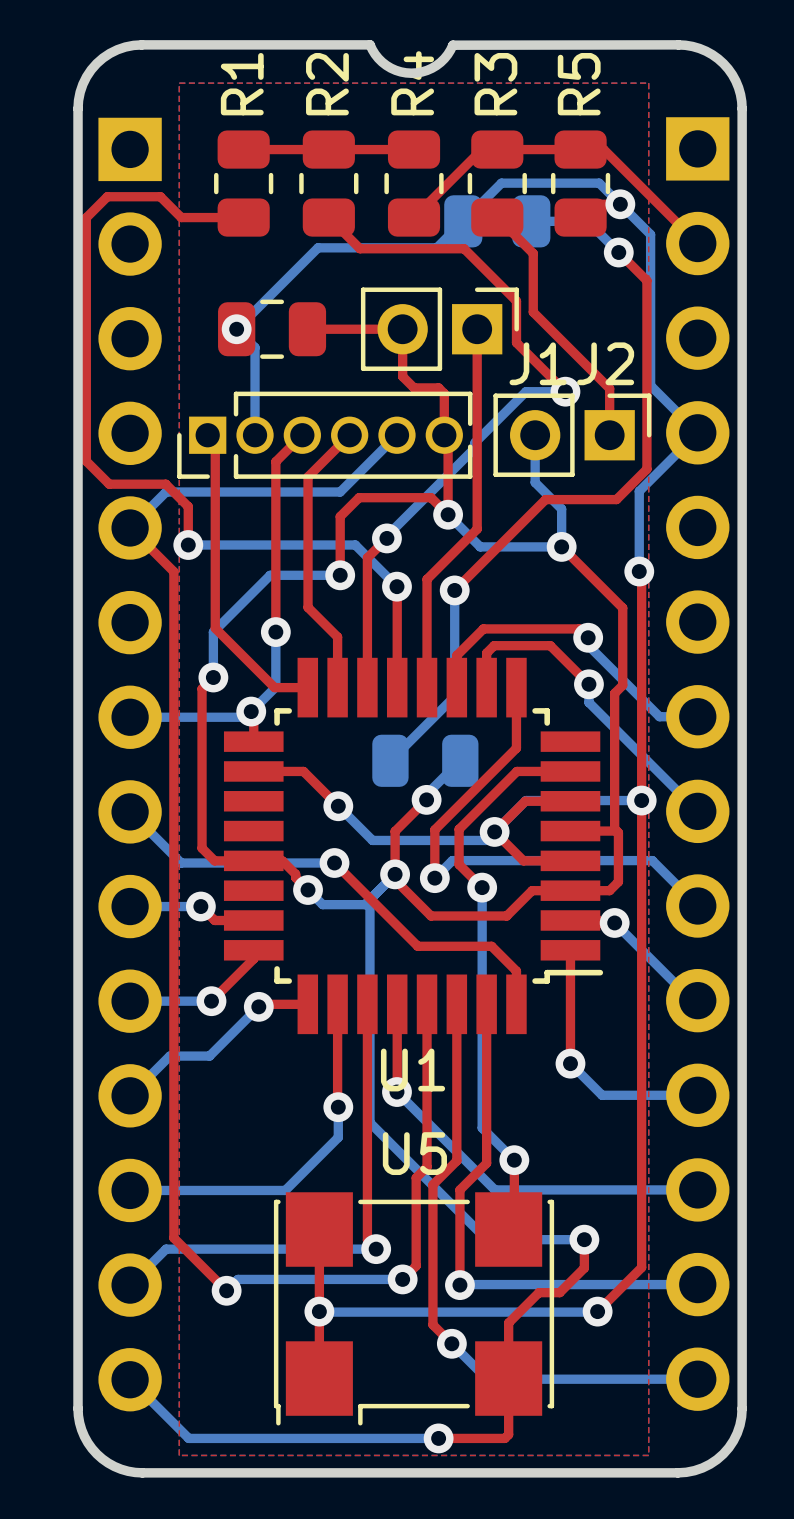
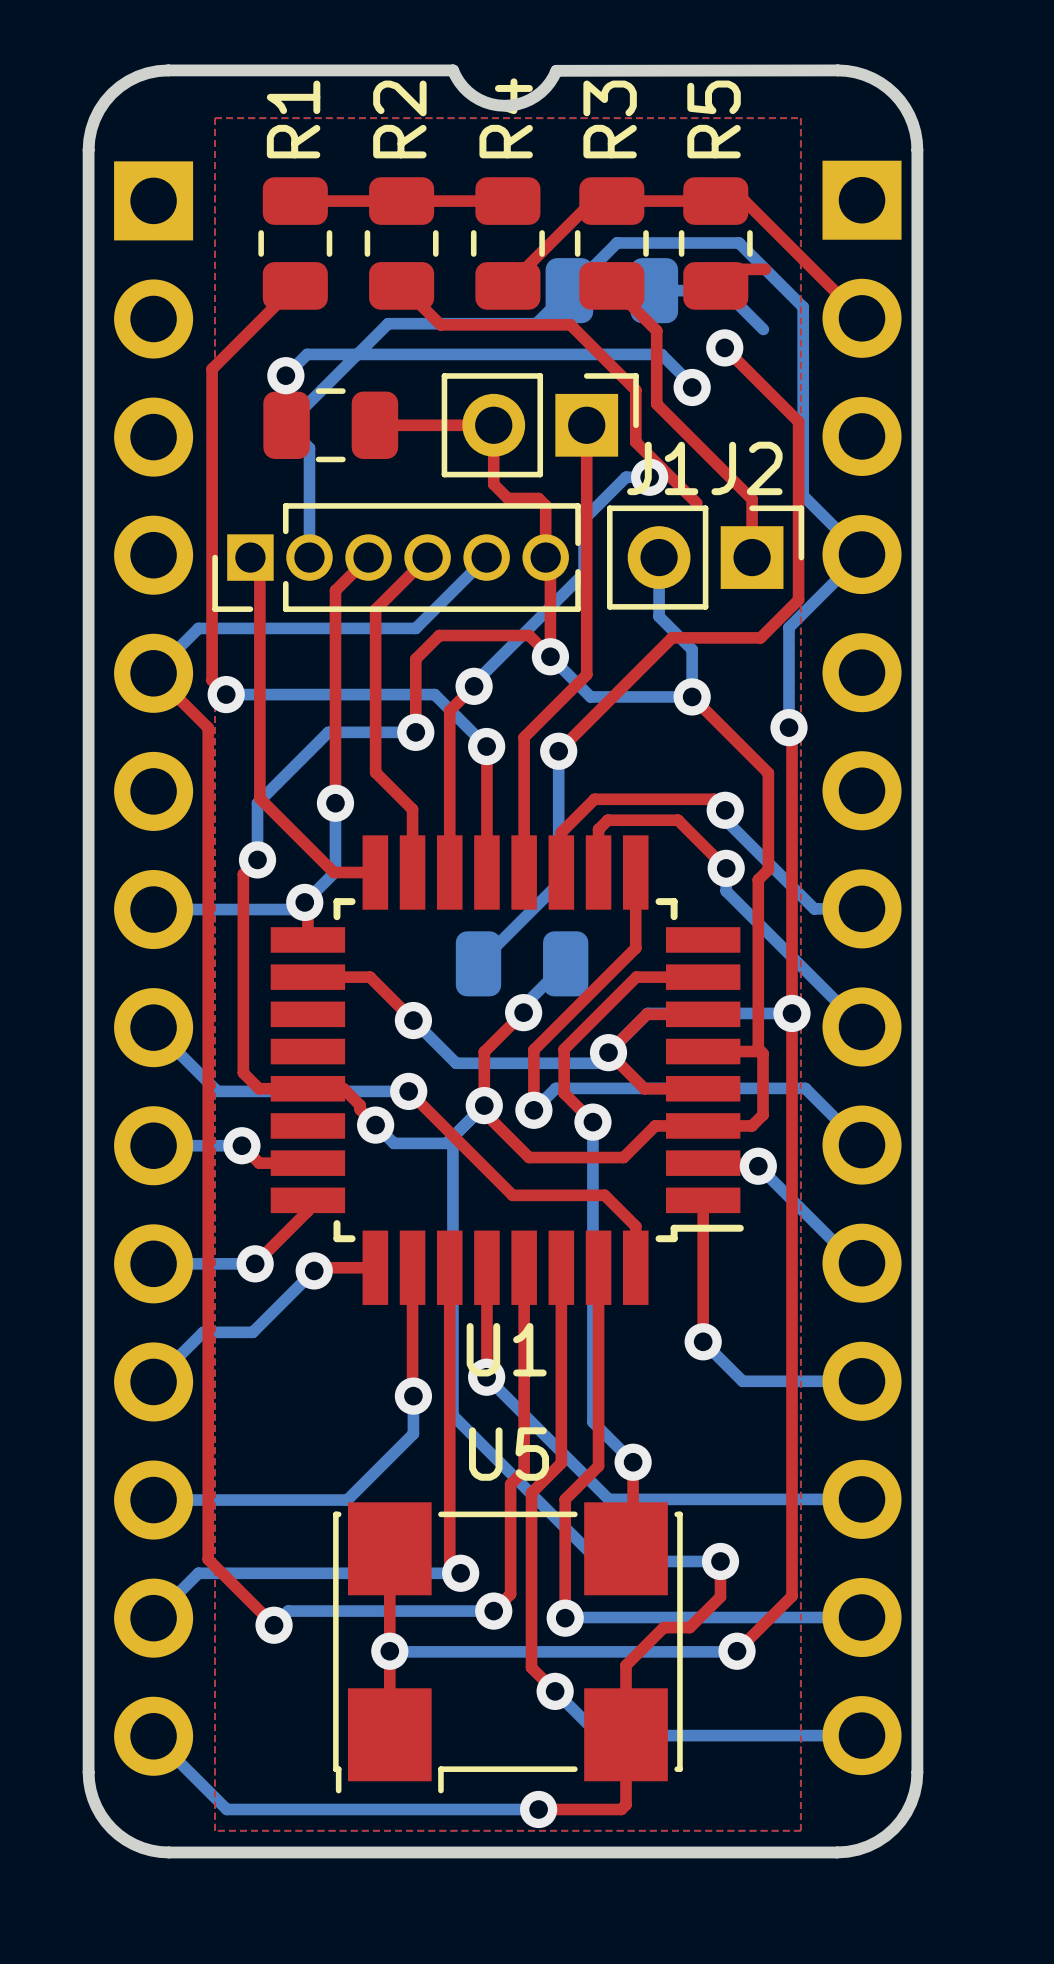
via: (620, 204) -> none
top track: (243, 217) (181, 217) (160, 196) (107, 196) (86, 217) (86, 461) (109, 484) (165, 484) (188, 506) (188, 545) -> (295, 285) (212, 369) (212, 680) (226, 694)
top track: (618, 252) (646, 280) (646, 326) -> (724, 347) (798, 421)
via position: (618, 252) -> (724, 347)
bottom track: none -> (285, 375) (307, 354) (661, 354) (692, 385)
via: none -> (692, 387)
via position: (236, 329) -> (285, 375)
bottom track: (565, 391) (526, 391) (475, 442) -> (649, 477) (626, 477) (584, 519) (584, 566)
via position: (565, 391) -> (649, 477)

